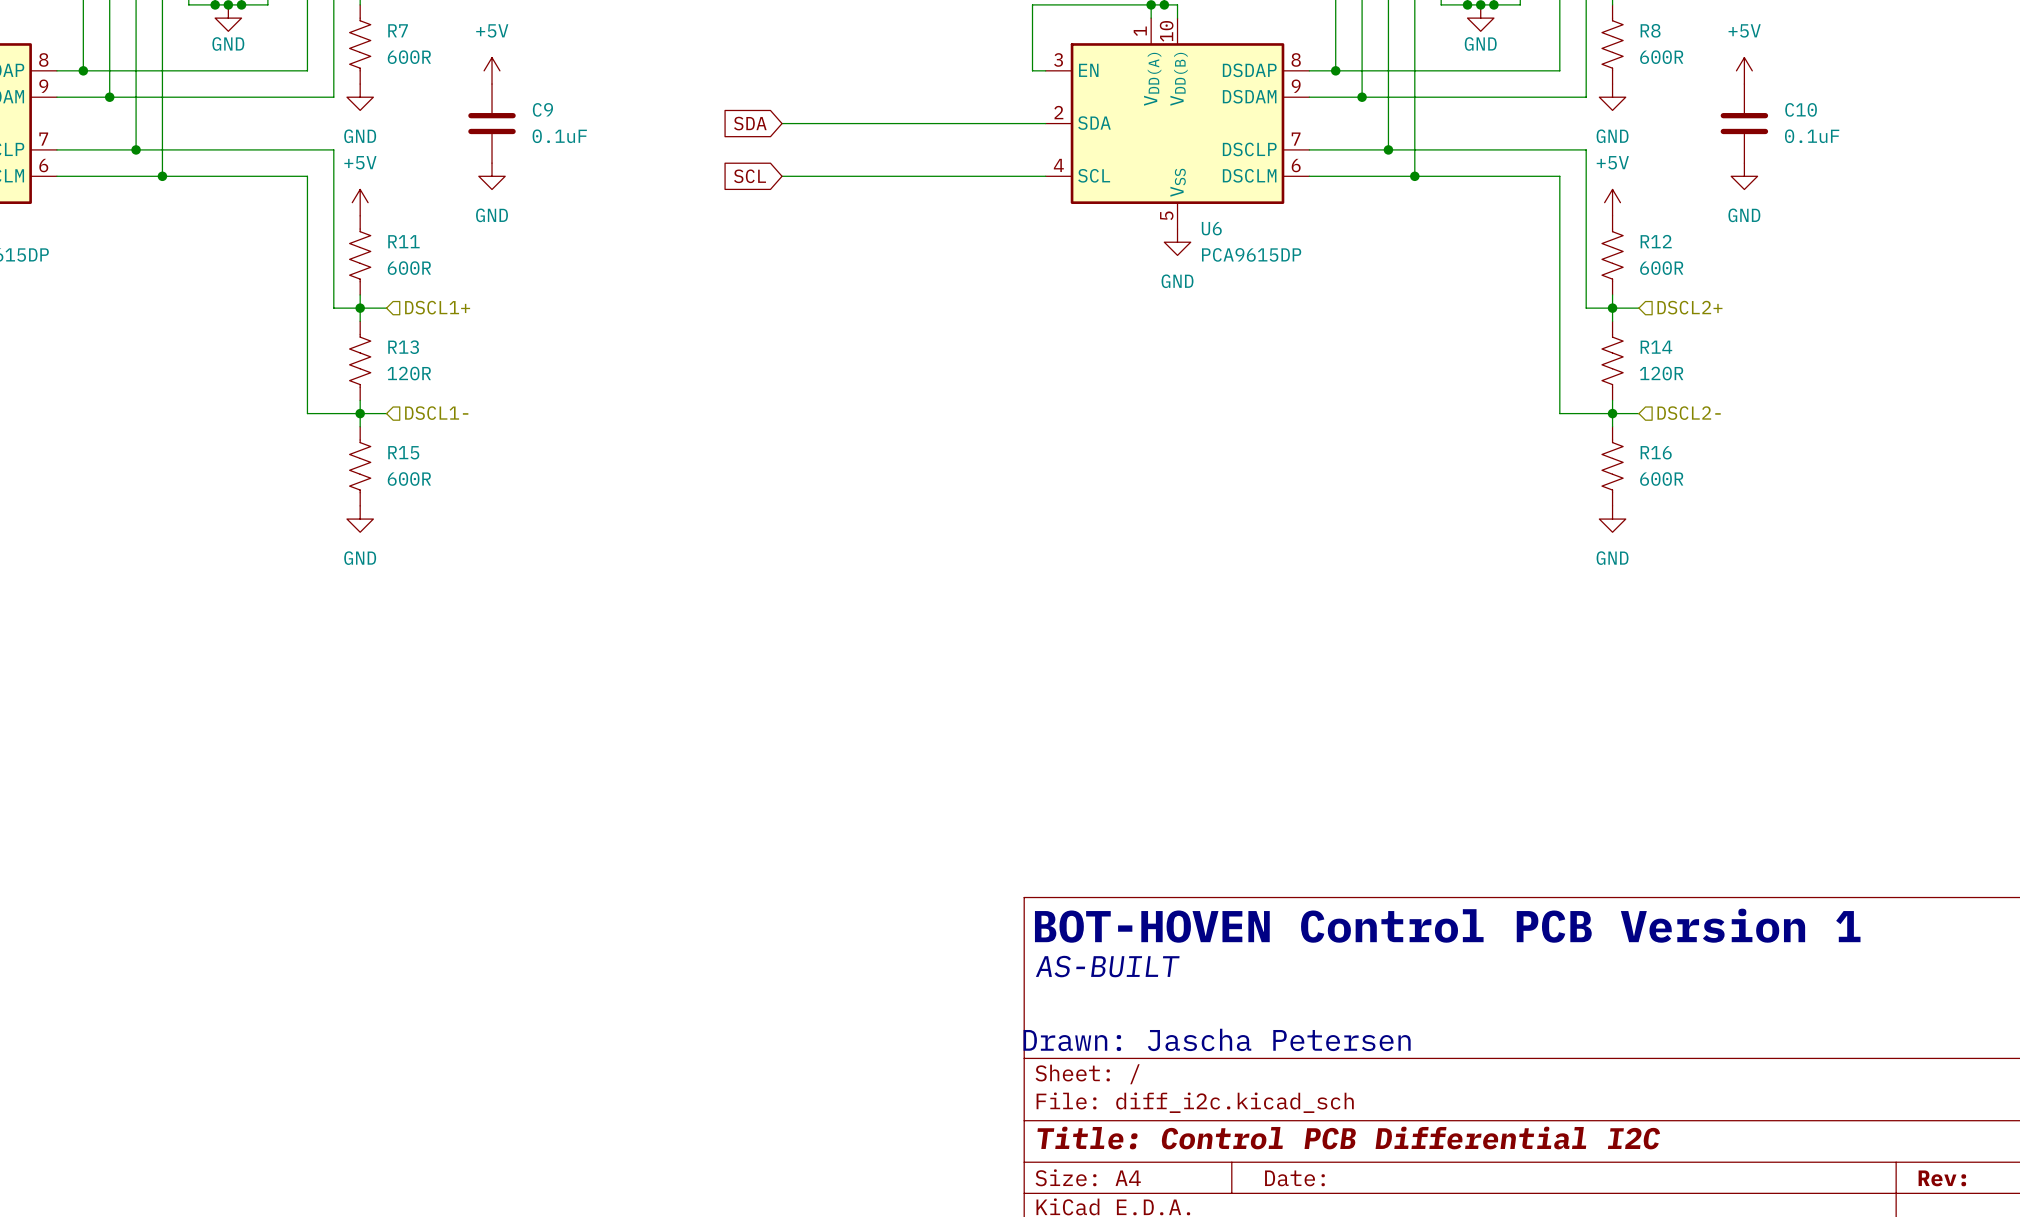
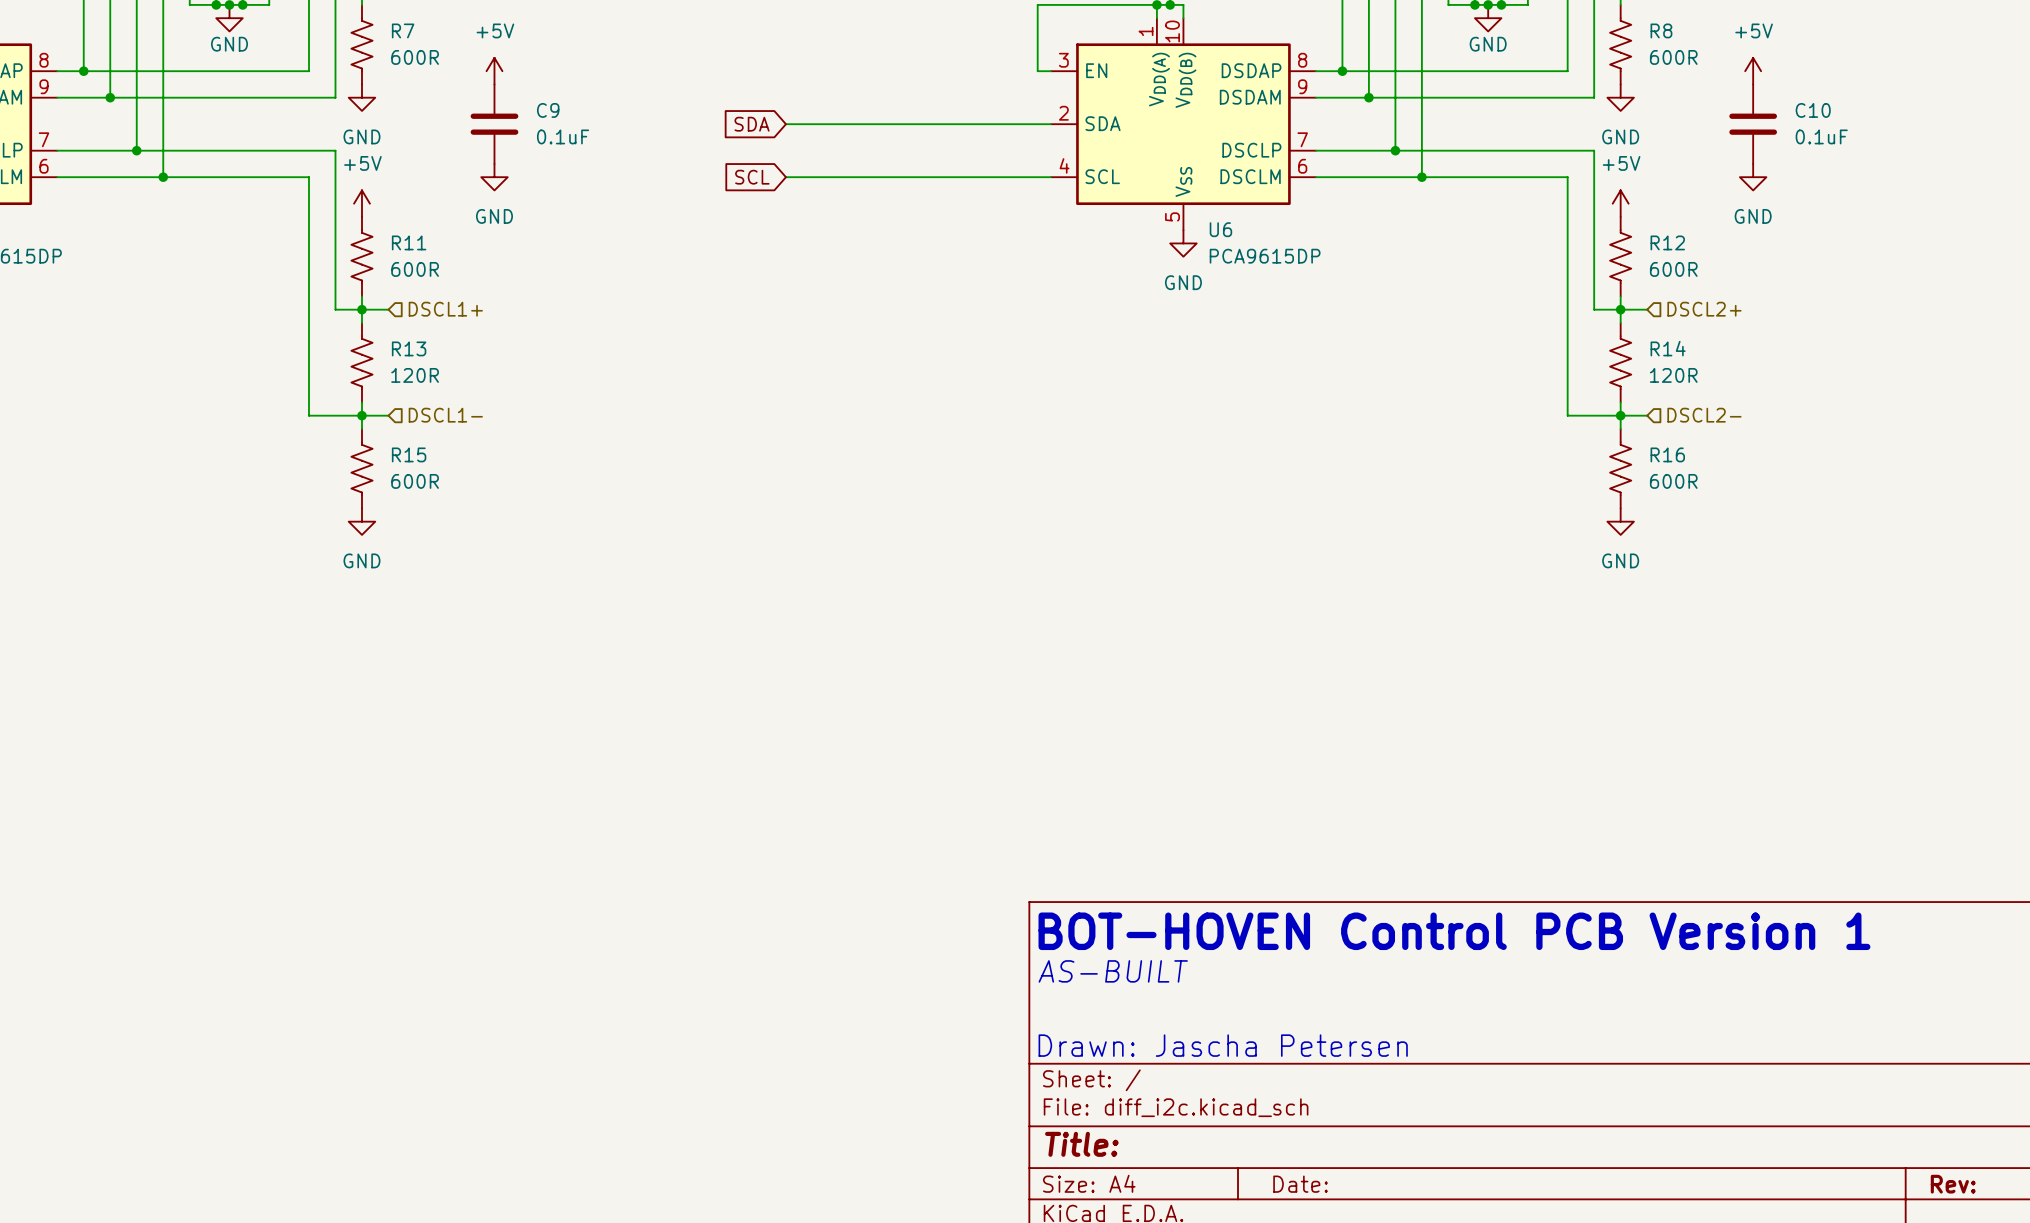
title block: Title: Control PCB Differential I2C (1348, 1137) -> Title: (1081, 1144)

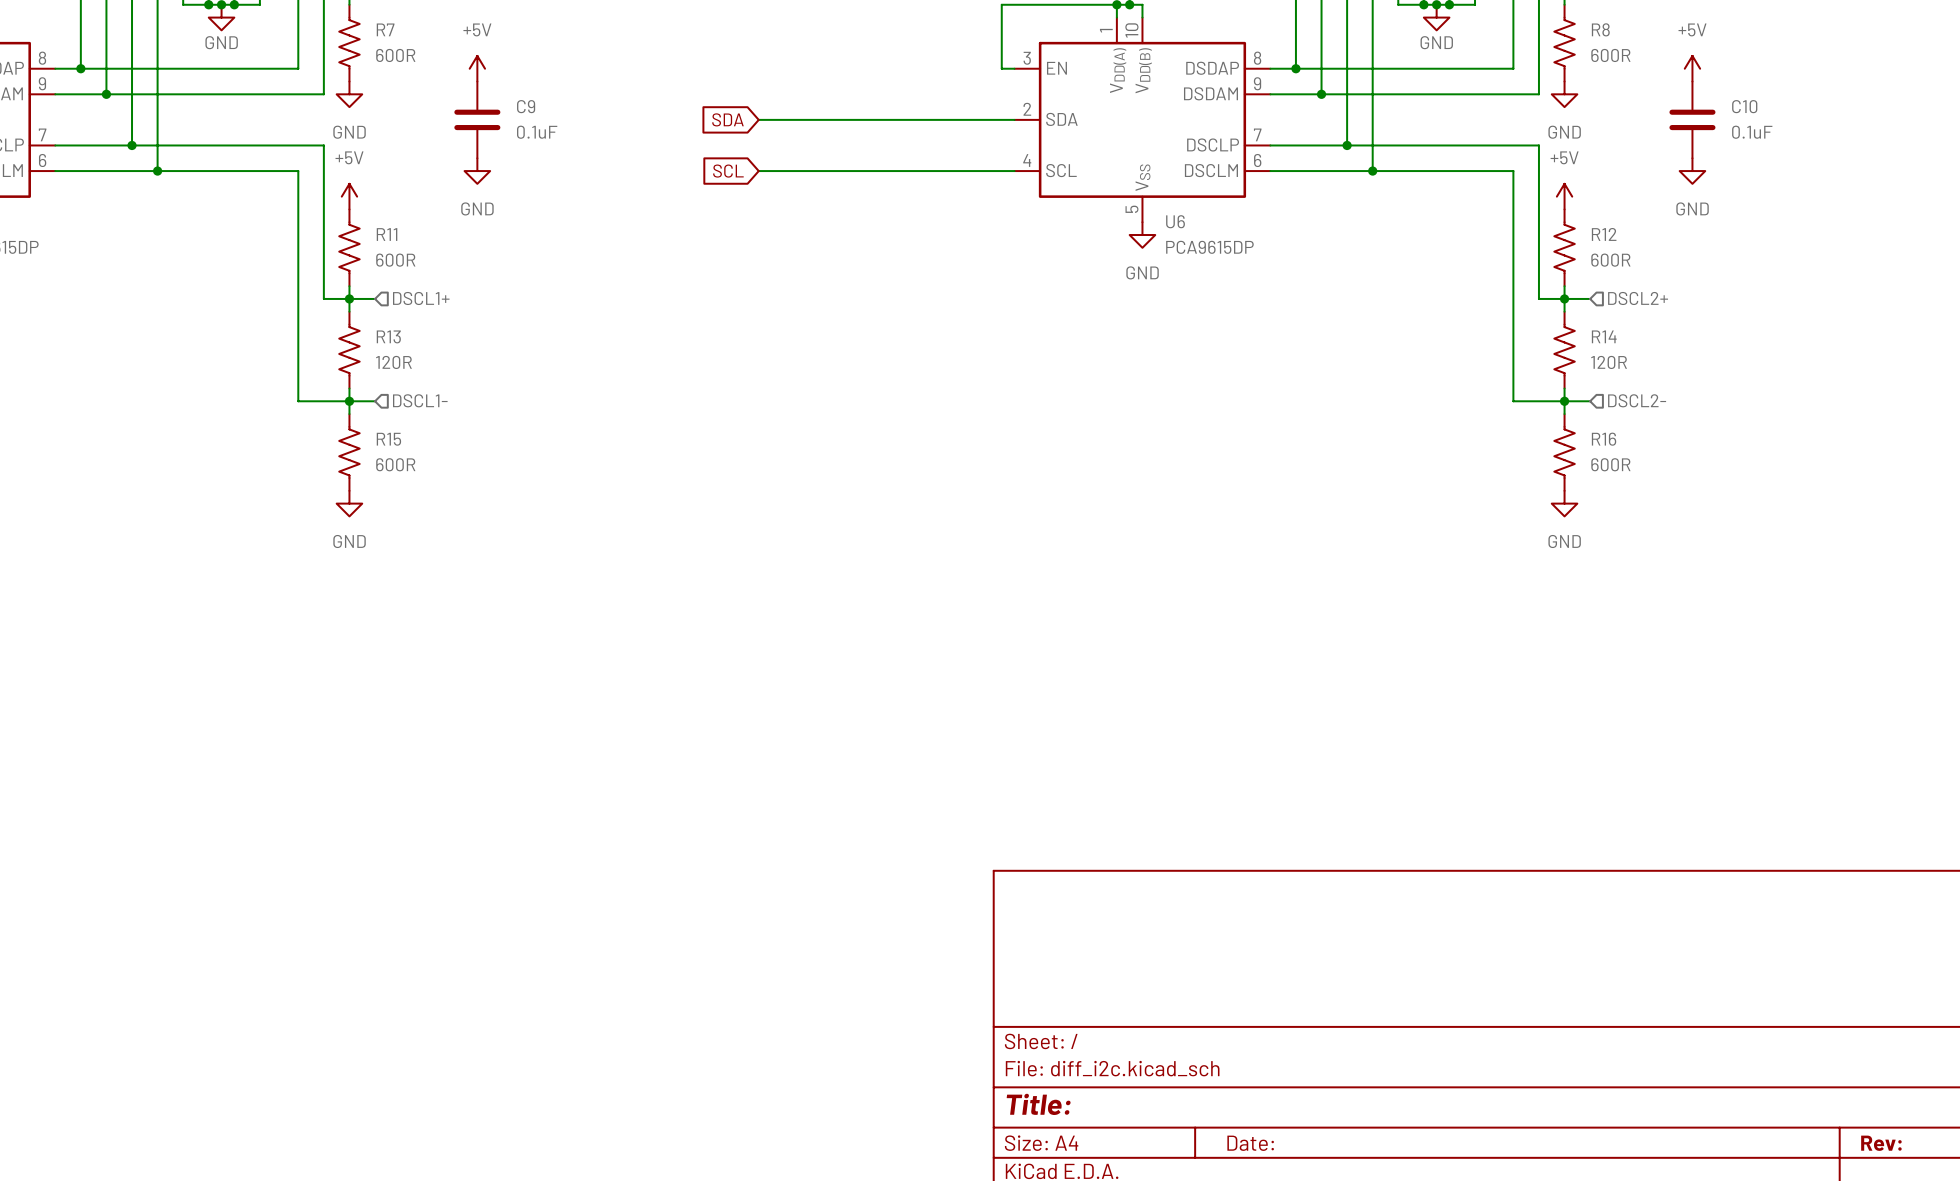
text: BOT-HOVEN Control PCB Version 1 (1454, 931) -> none
text: AS-BUILT (1113, 971) -> none
text: Drawn: Jascha Petersen (1223, 1045) -> none

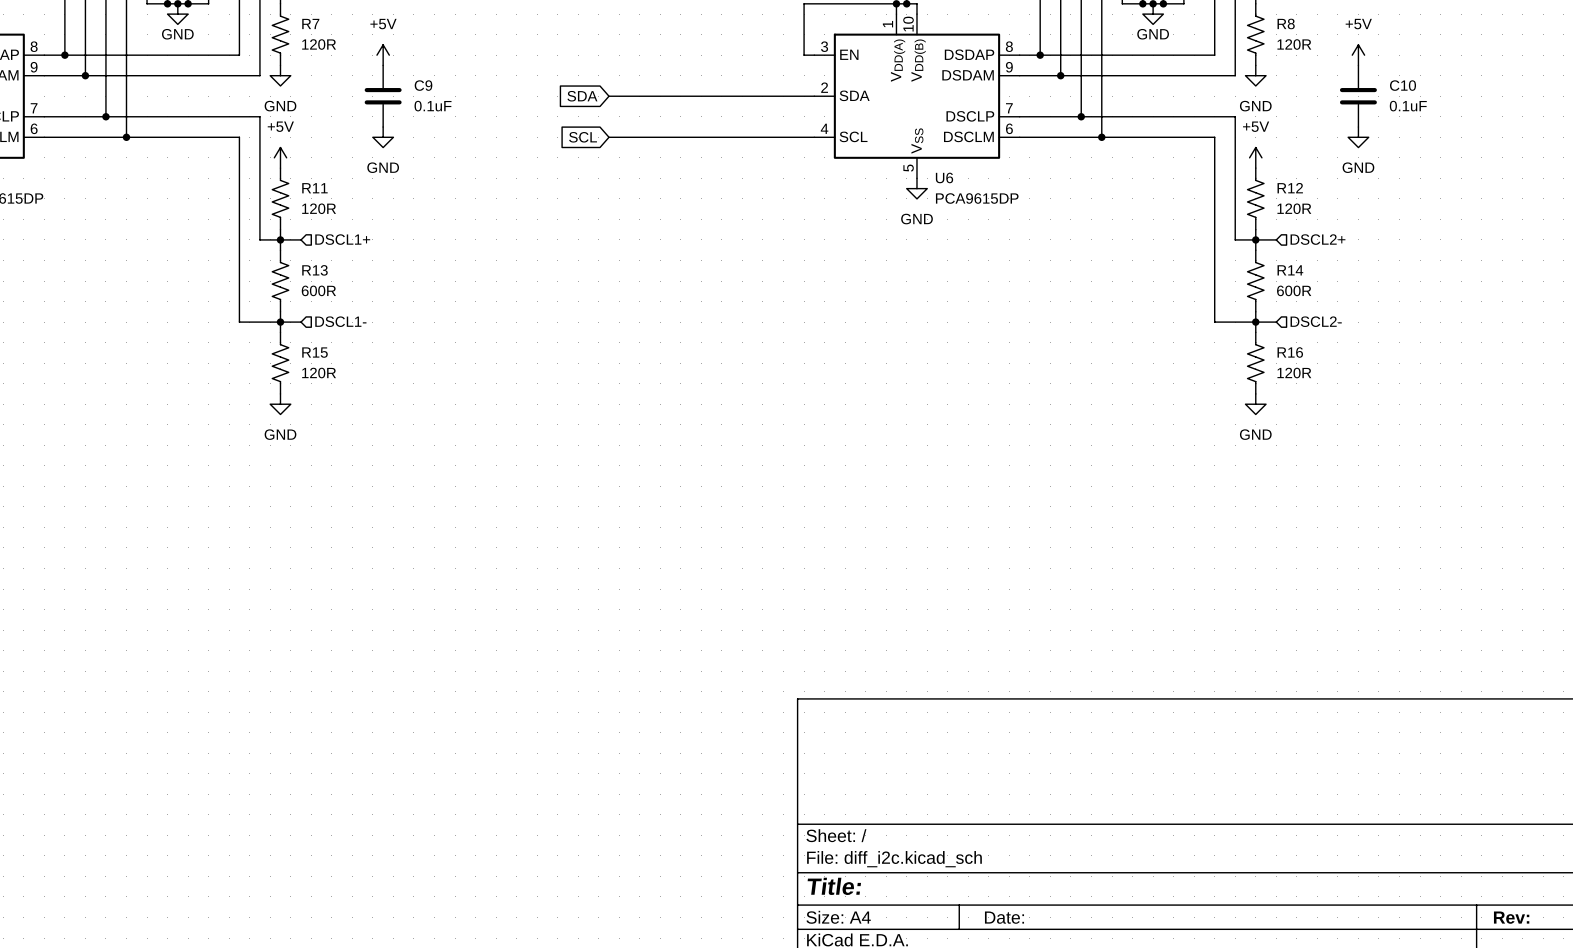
R7 value: 600R (395, 55) -> 120R (319, 44)
R8 value: 600R (1610, 55) -> 120R (1294, 44)
R11 value: 600R (395, 260) -> 120R (319, 208)
R12 value: 600R (1610, 260) -> 120R (1294, 208)
R13 value: 120R (393, 362) -> 600R (318, 290)
R14 value: 120R (1609, 362) -> 600R (1294, 290)
R15 value: 600R (395, 464) -> 120R (319, 373)
R16 value: 600R (1610, 464) -> 120R (1294, 373)

